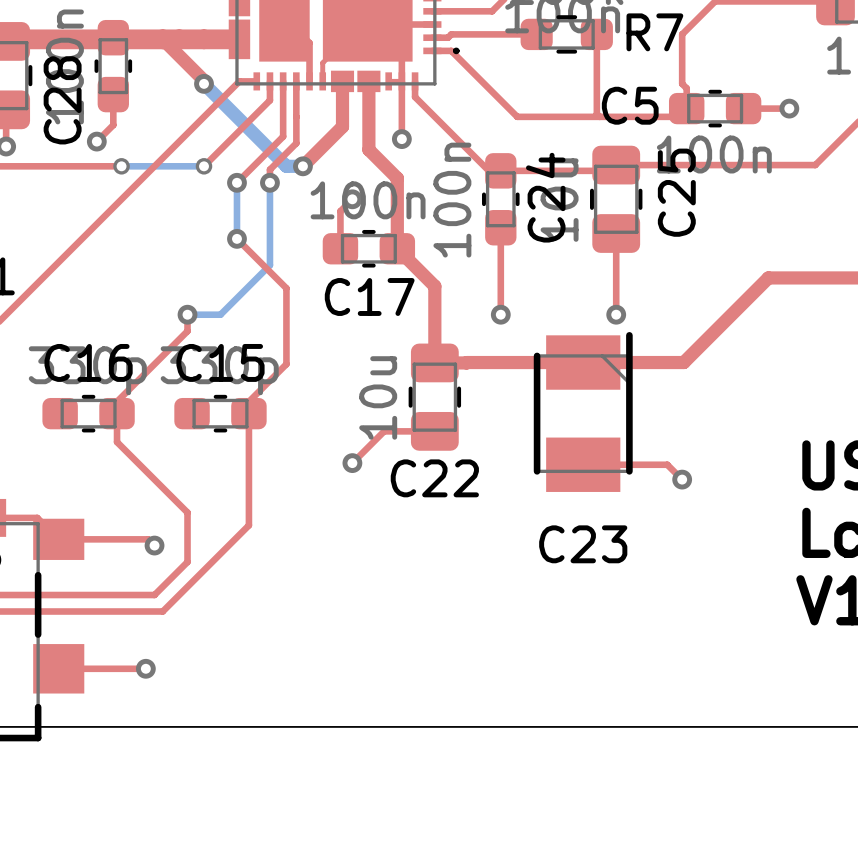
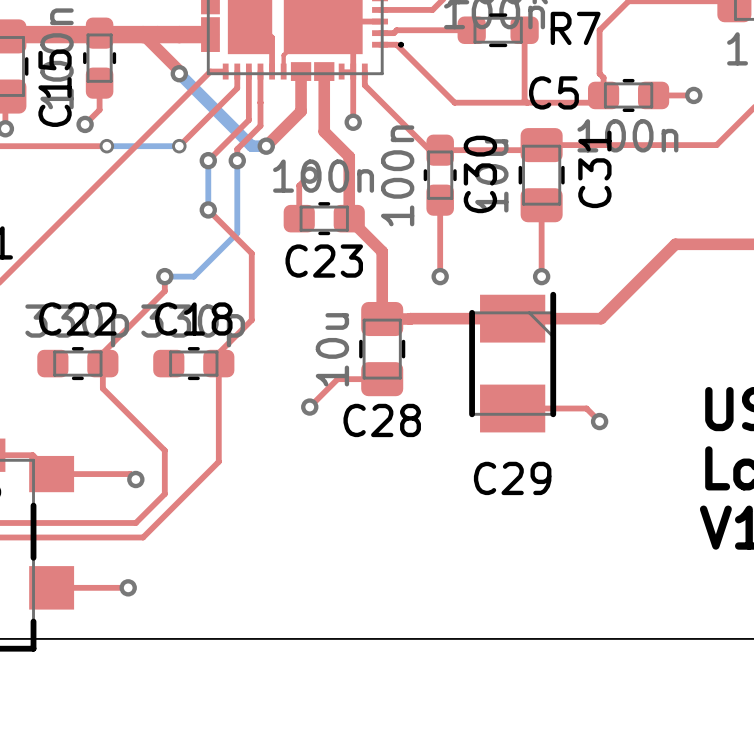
C28 name: C28 (62, 100) -> C15 (55, 88)
C25 name: C25 (676, 192) -> C31 (594, 169)
C24 name: C24 (545, 197) -> C30 (480, 174)
C17 name: C17 (369, 296) -> C23 (324, 261)
C16 name: C16 (88, 362) -> C22 (77, 319)
C15 name: C15 (220, 362) -> C18 (193, 319)
C22 name: C22 (434, 478) -> C28 (382, 420)
C23 name: C23 (583, 544) -> C29 (512, 478)

